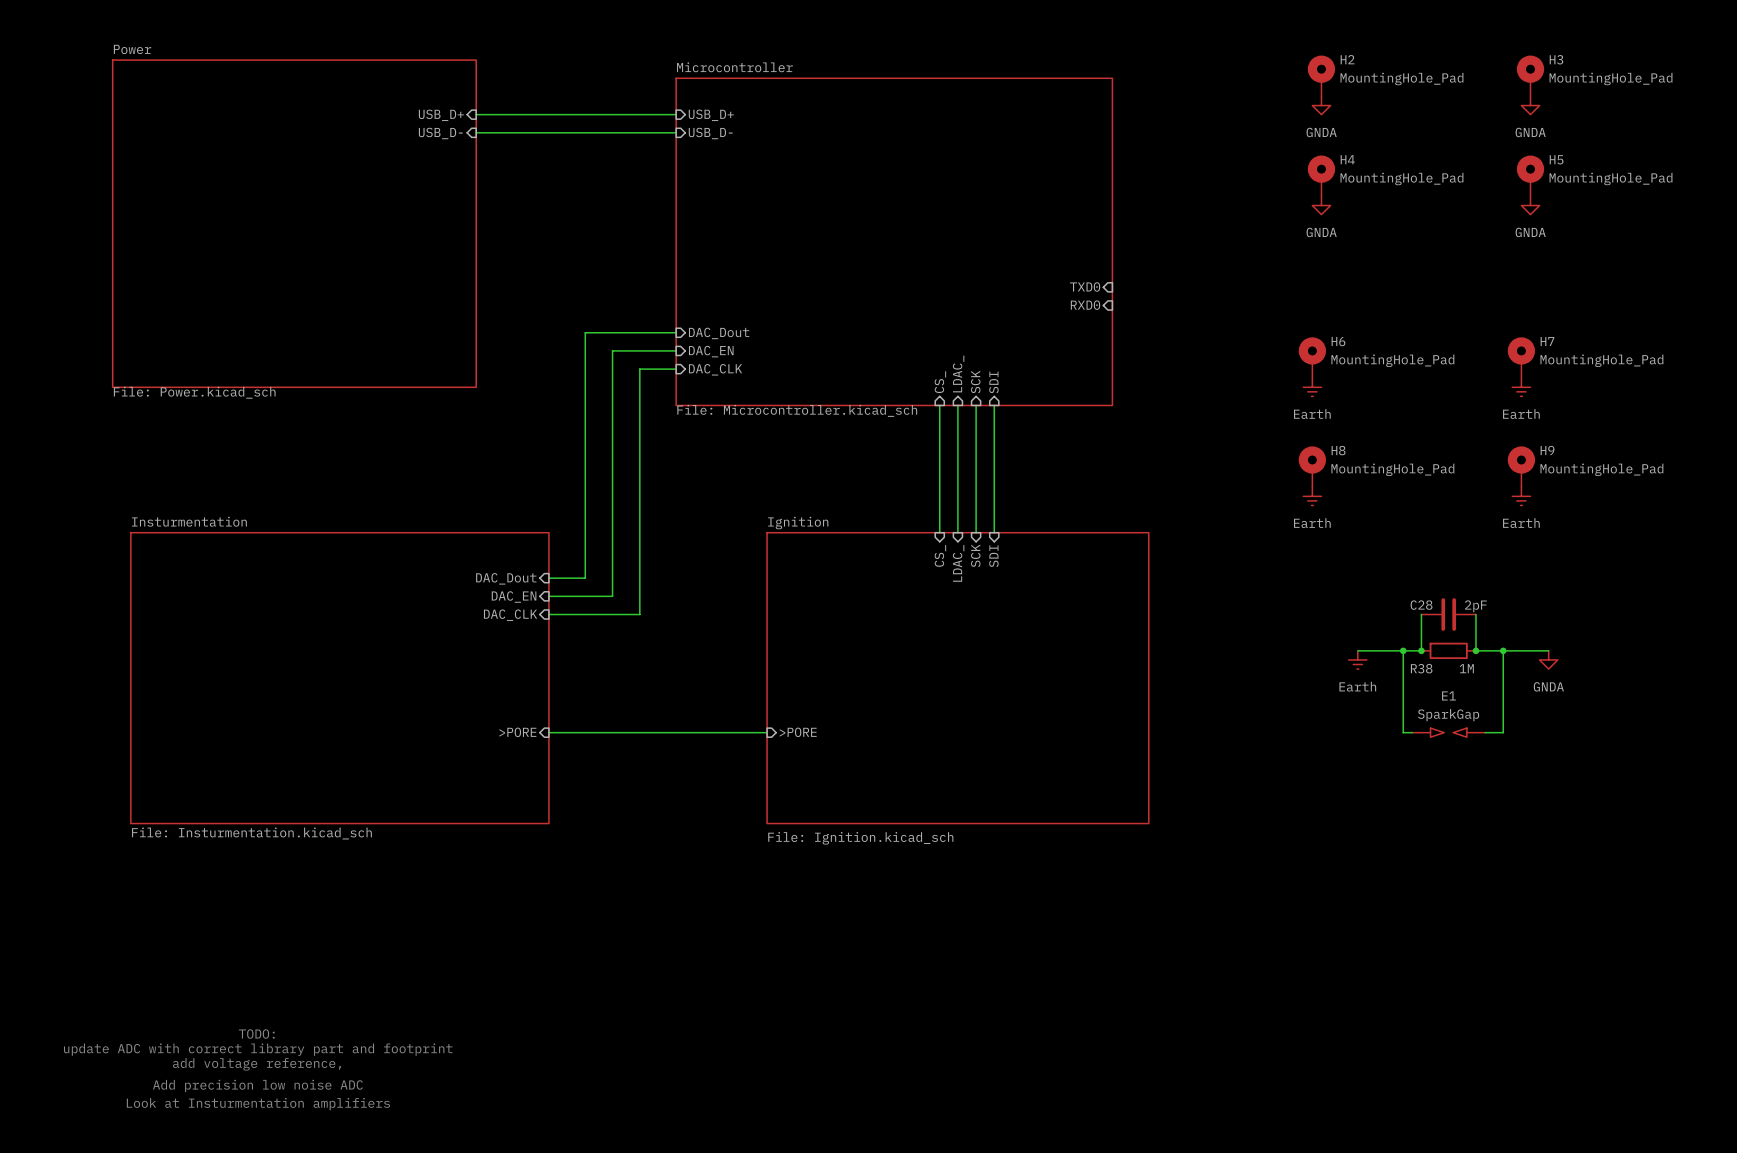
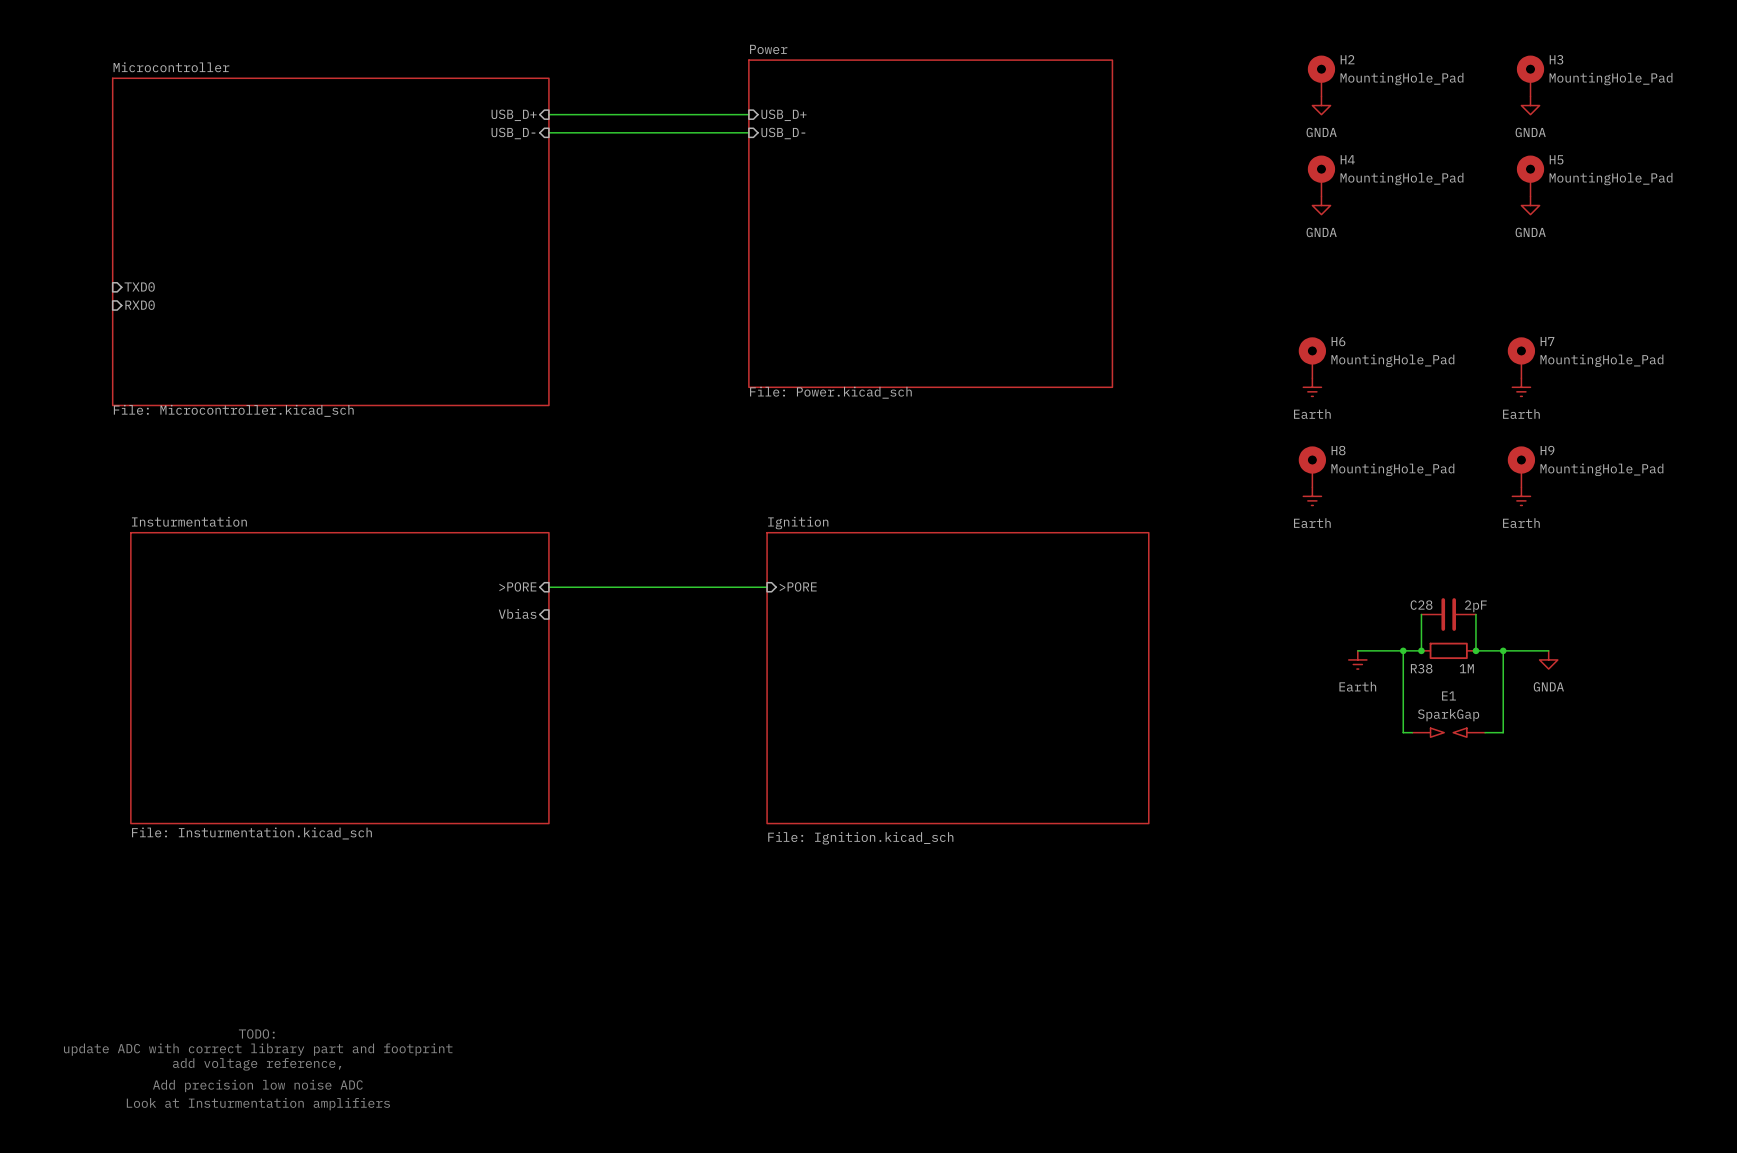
wire: (476, 114) (548, 114) -> none
wire: none -> (676, 114) (748, 114)
sheet pin position: USB_D+ (441, 115) -> USB_D+ (514, 115)
sheet pin position: USB_D+ (711, 115) -> USB_D+ (783, 115)
wire: (476, 132) (548, 132) -> none
wire: none -> (676, 132) (748, 132)
sheet pin position: USB_D- (440, 133) -> USB_D- (513, 133)
sheet pin position: USB_D- (710, 133) -> USB_D- (783, 133)
sheet Power: File: Power.kicad_sch (294, 223) -> none
sheet Power: none -> File: Power.kicad_sch (930, 223)
sheet Microcontroller: none -> File: Microcontroller.kicad_sch (330, 241)
sheet Microcontroller: File: Microcontroller.kicad_sch (894, 241) -> none
sheet pin: none -> TXD0 (139, 286)
sheet pin: TXD0 (1085, 286) -> none
sheet pin: none -> RXD0 (140, 305)
sheet pin: RXD0 (1085, 305) -> none
wire: (676, 332) (585, 332) (585, 578) (548, 578) -> none
sheet pin: DAC_Dout (719, 333) -> none
wire: (676, 350) (612, 350) (612, 596) (548, 596) -> none
sheet pin: DAC_EN (711, 351) -> none
wire: (676, 369) (639, 369) (639, 614) (548, 614) -> none
sheet pin: DAC_CLK (715, 369) -> none
sheet pin: LDAC_ (958, 374) -> none
sheet pin: CS_ (940, 382) -> none
sheet pin: SCK (975, 382) -> none
sheet pin: SDI (993, 382) -> none
wire: (939, 405) (939, 532) -> none
wire: (957, 405) (957, 532) -> none
wire: (976, 405) (976, 532) -> none
wire: (994, 405) (994, 532) -> none
sheet pin: CS_ (940, 555) -> none
sheet pin: SCK (975, 555) -> none
sheet pin: SDI (993, 556) -> none
sheet pin: LDAC_ (958, 563) -> none
sheet pin: DAC_Dout (506, 578) -> none
sheet pin: none -> >PORE (517, 586)
sheet pin: none -> >PORE (798, 586)
sheet pin: DAC_EN (514, 597) -> none
sheet pin: DAC_CLK (510, 615) -> Vbias (517, 613)
sheet pin: >PORE (517, 732) -> none
wire: (548, 732) (767, 732) -> (548, 587) (767, 587)
sheet pin: >PORE (798, 732) -> none

